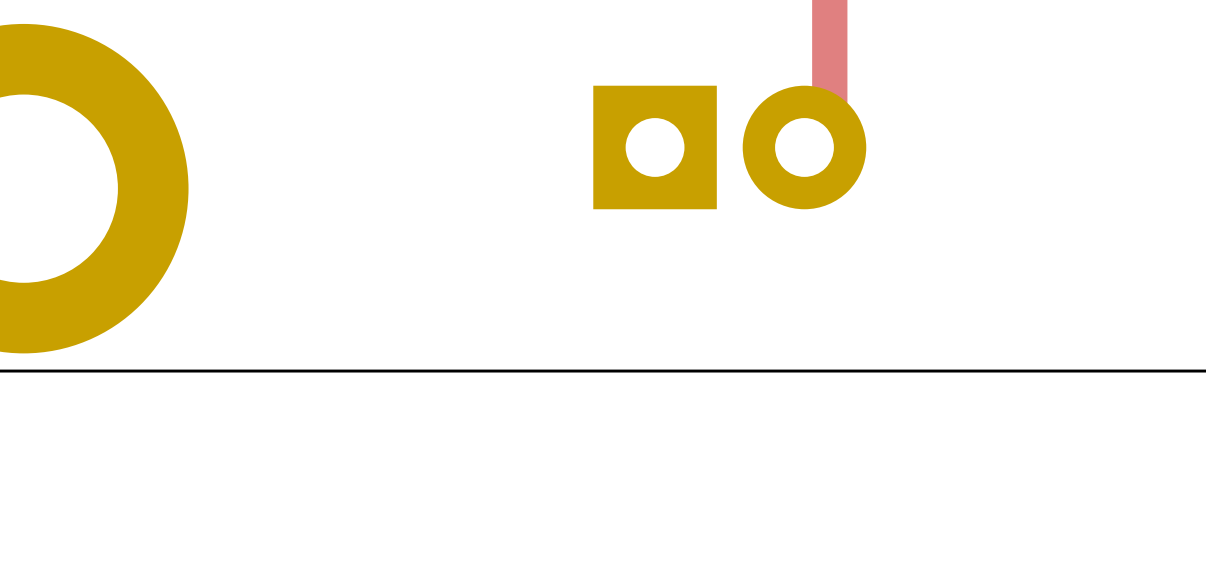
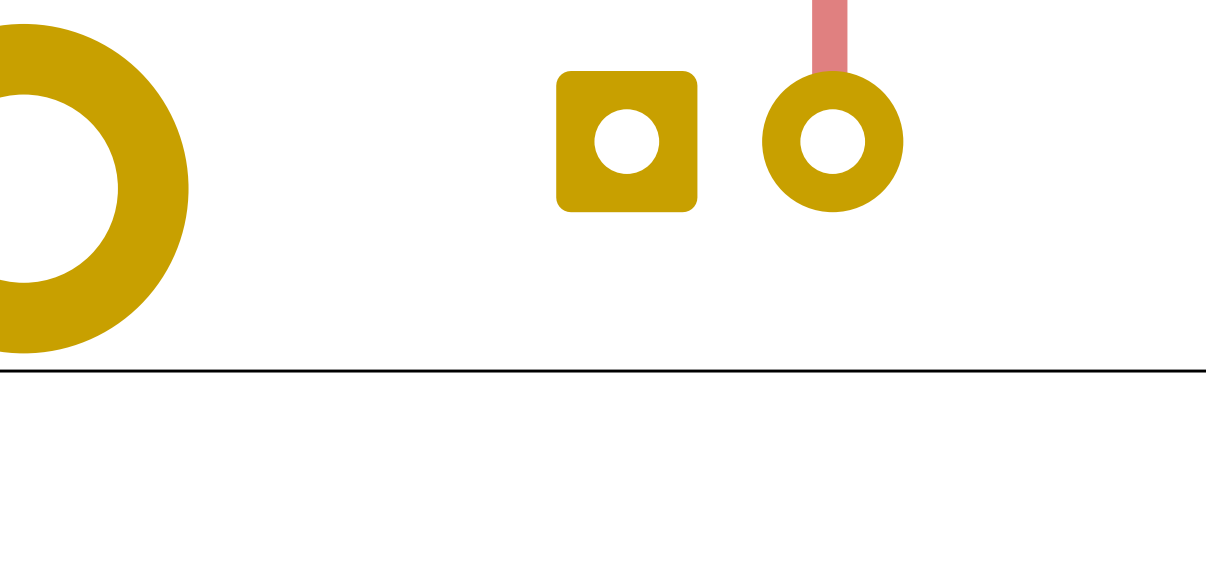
part footprint: [593, 85, 867, 210] -> [556, 71, 904, 213]

